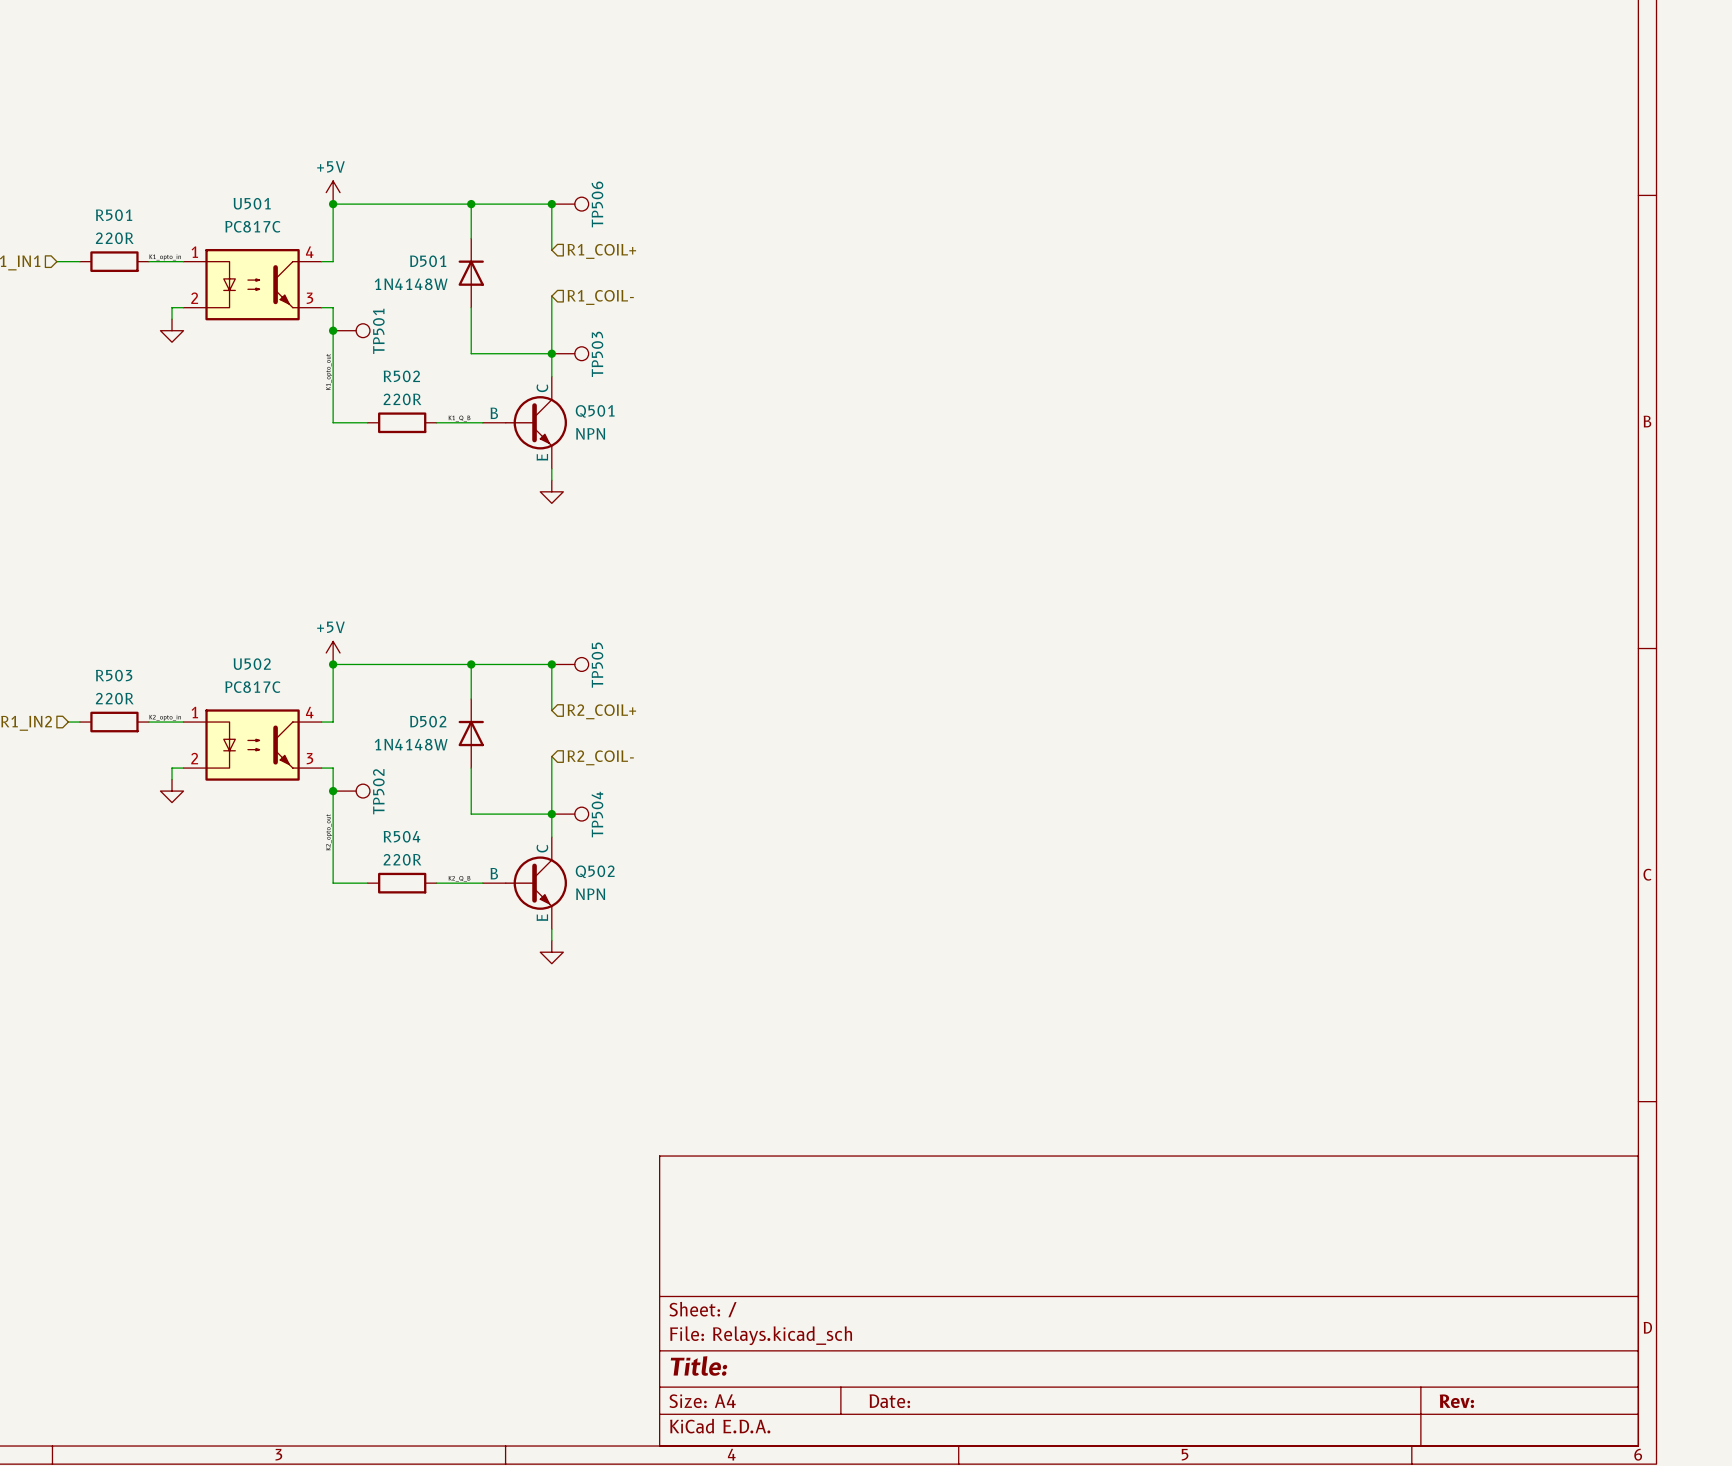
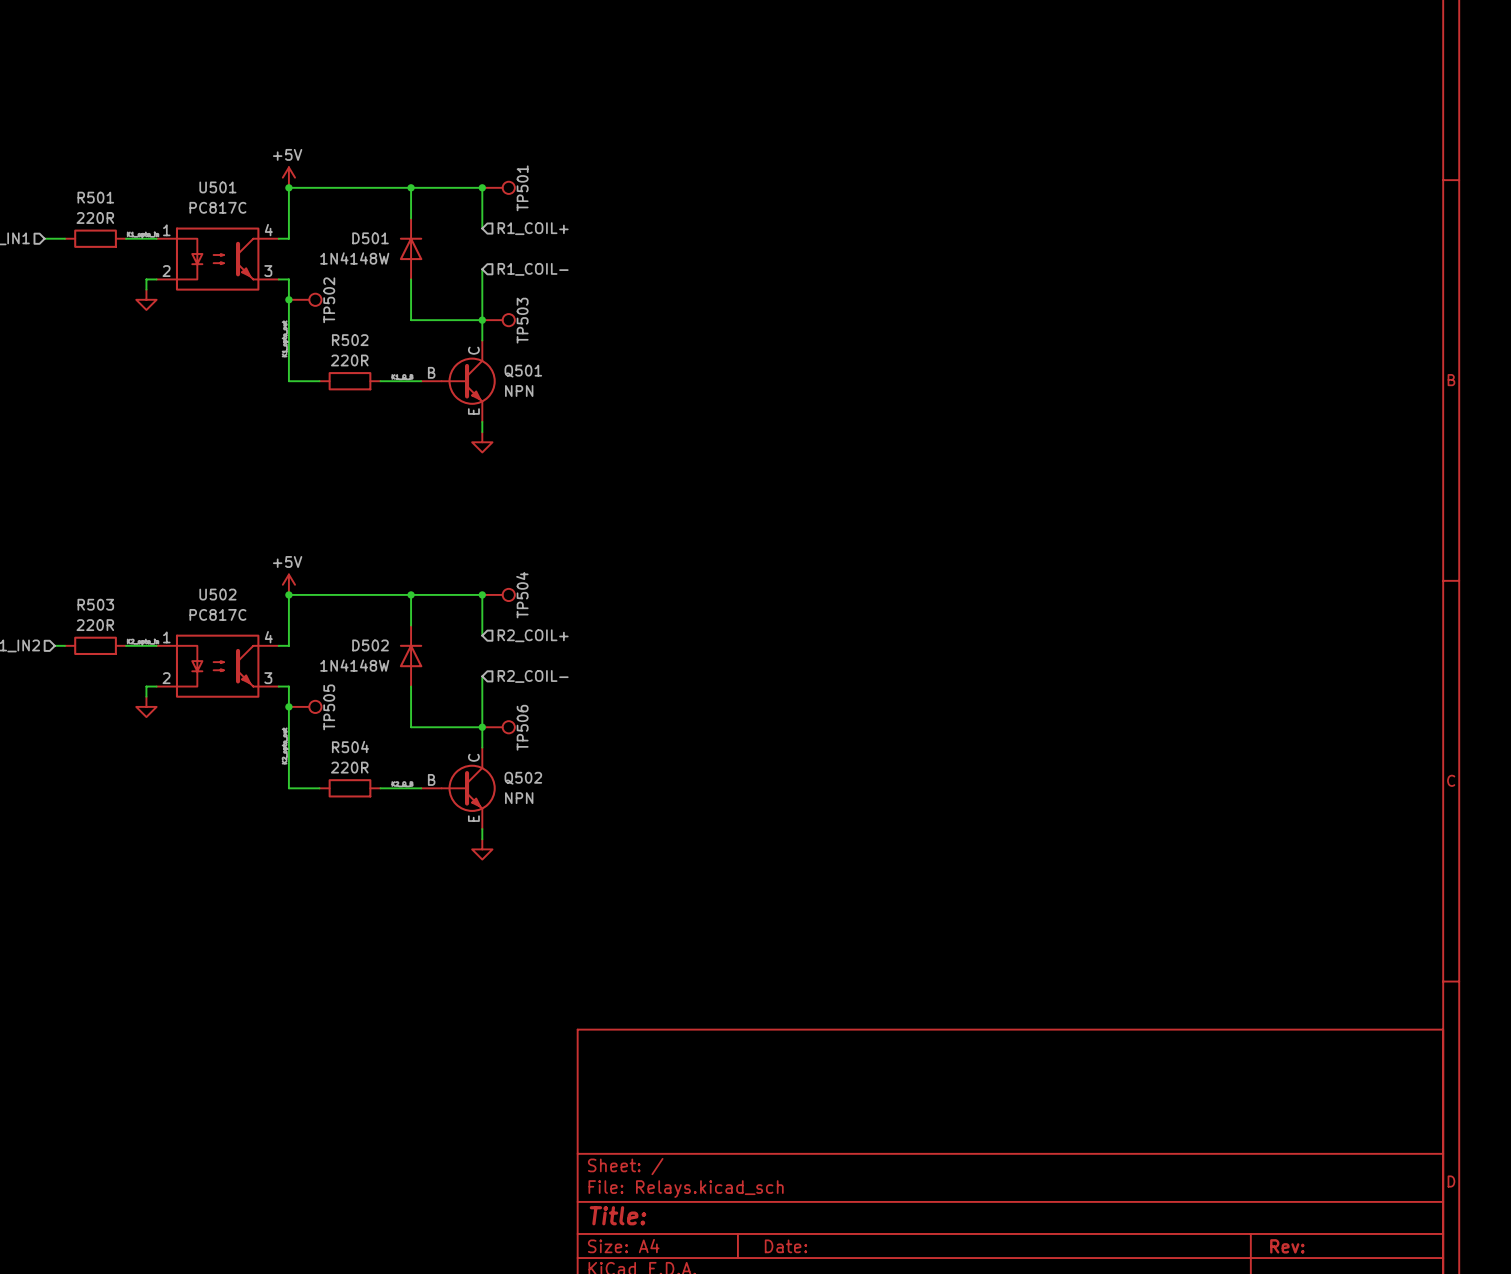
TP506 name: TP506 (597, 204) -> TP501 (522, 188)
TP501 name: TP501 (378, 331) -> TP502 (329, 300)
TP505 name: TP505 (597, 665) -> TP504 (522, 595)
TP502 name: TP502 (378, 791) -> TP505 (329, 707)
TP504 name: TP504 (597, 814) -> TP506 (522, 727)

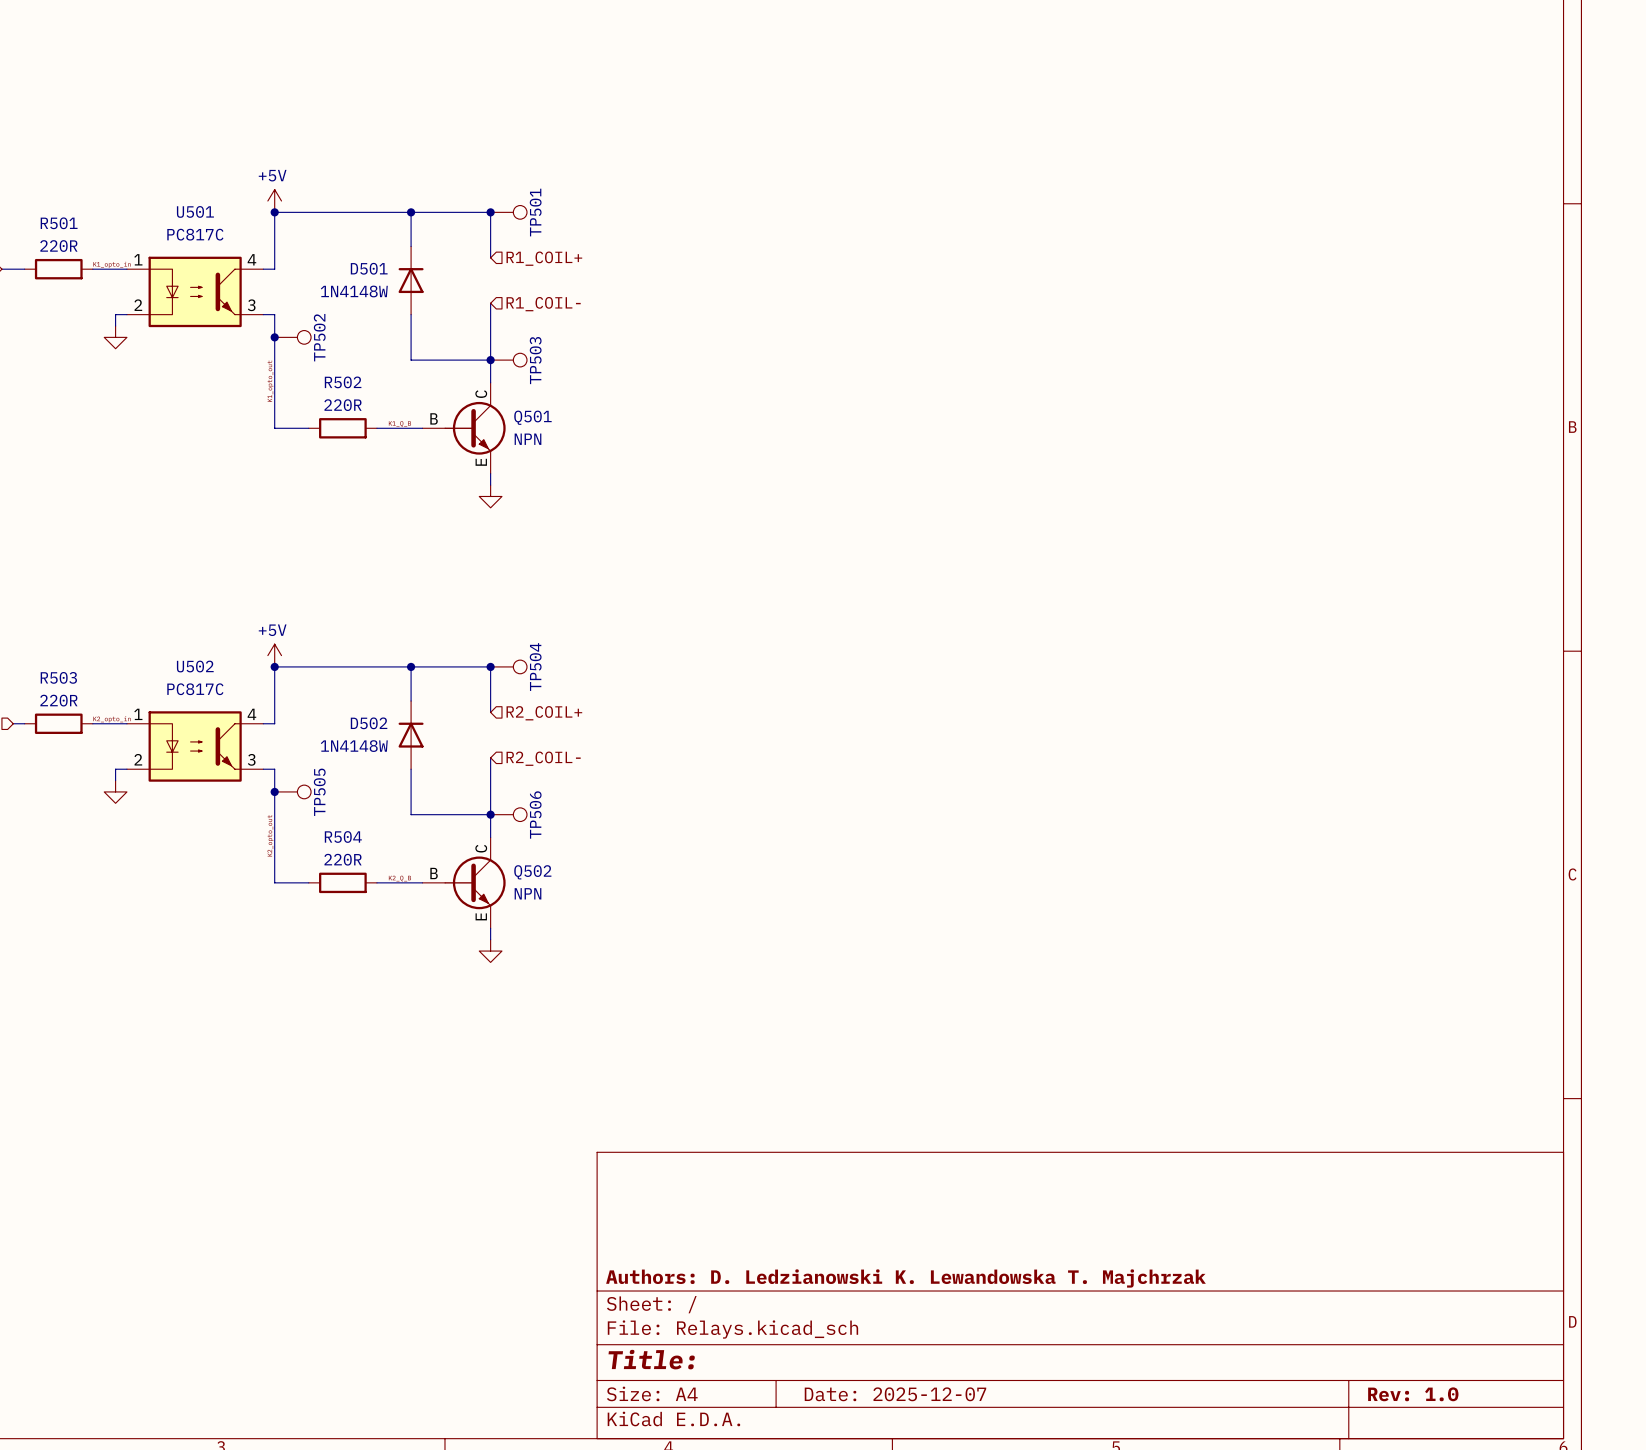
title block: none -> Authors: D. Ledzianowski K. Lewandowska T. Majchrzak (905, 1278)
title block: Date: (785, 1246) -> Date: 2025-12-07 (895, 1394)
title block: Rev: (1287, 1246) -> Rev: 1.0 (1413, 1394)

